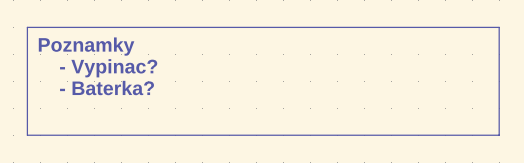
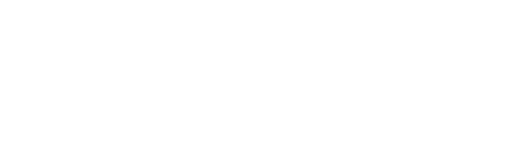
line: (27, 27) (499, 27) (499, 135) (27, 135) (27, 27) -> none
text: Poznamky (86, 46) -> none
text: - Vypinac? (108, 68) -> none
text: - Baterka? (107, 88) -> none

